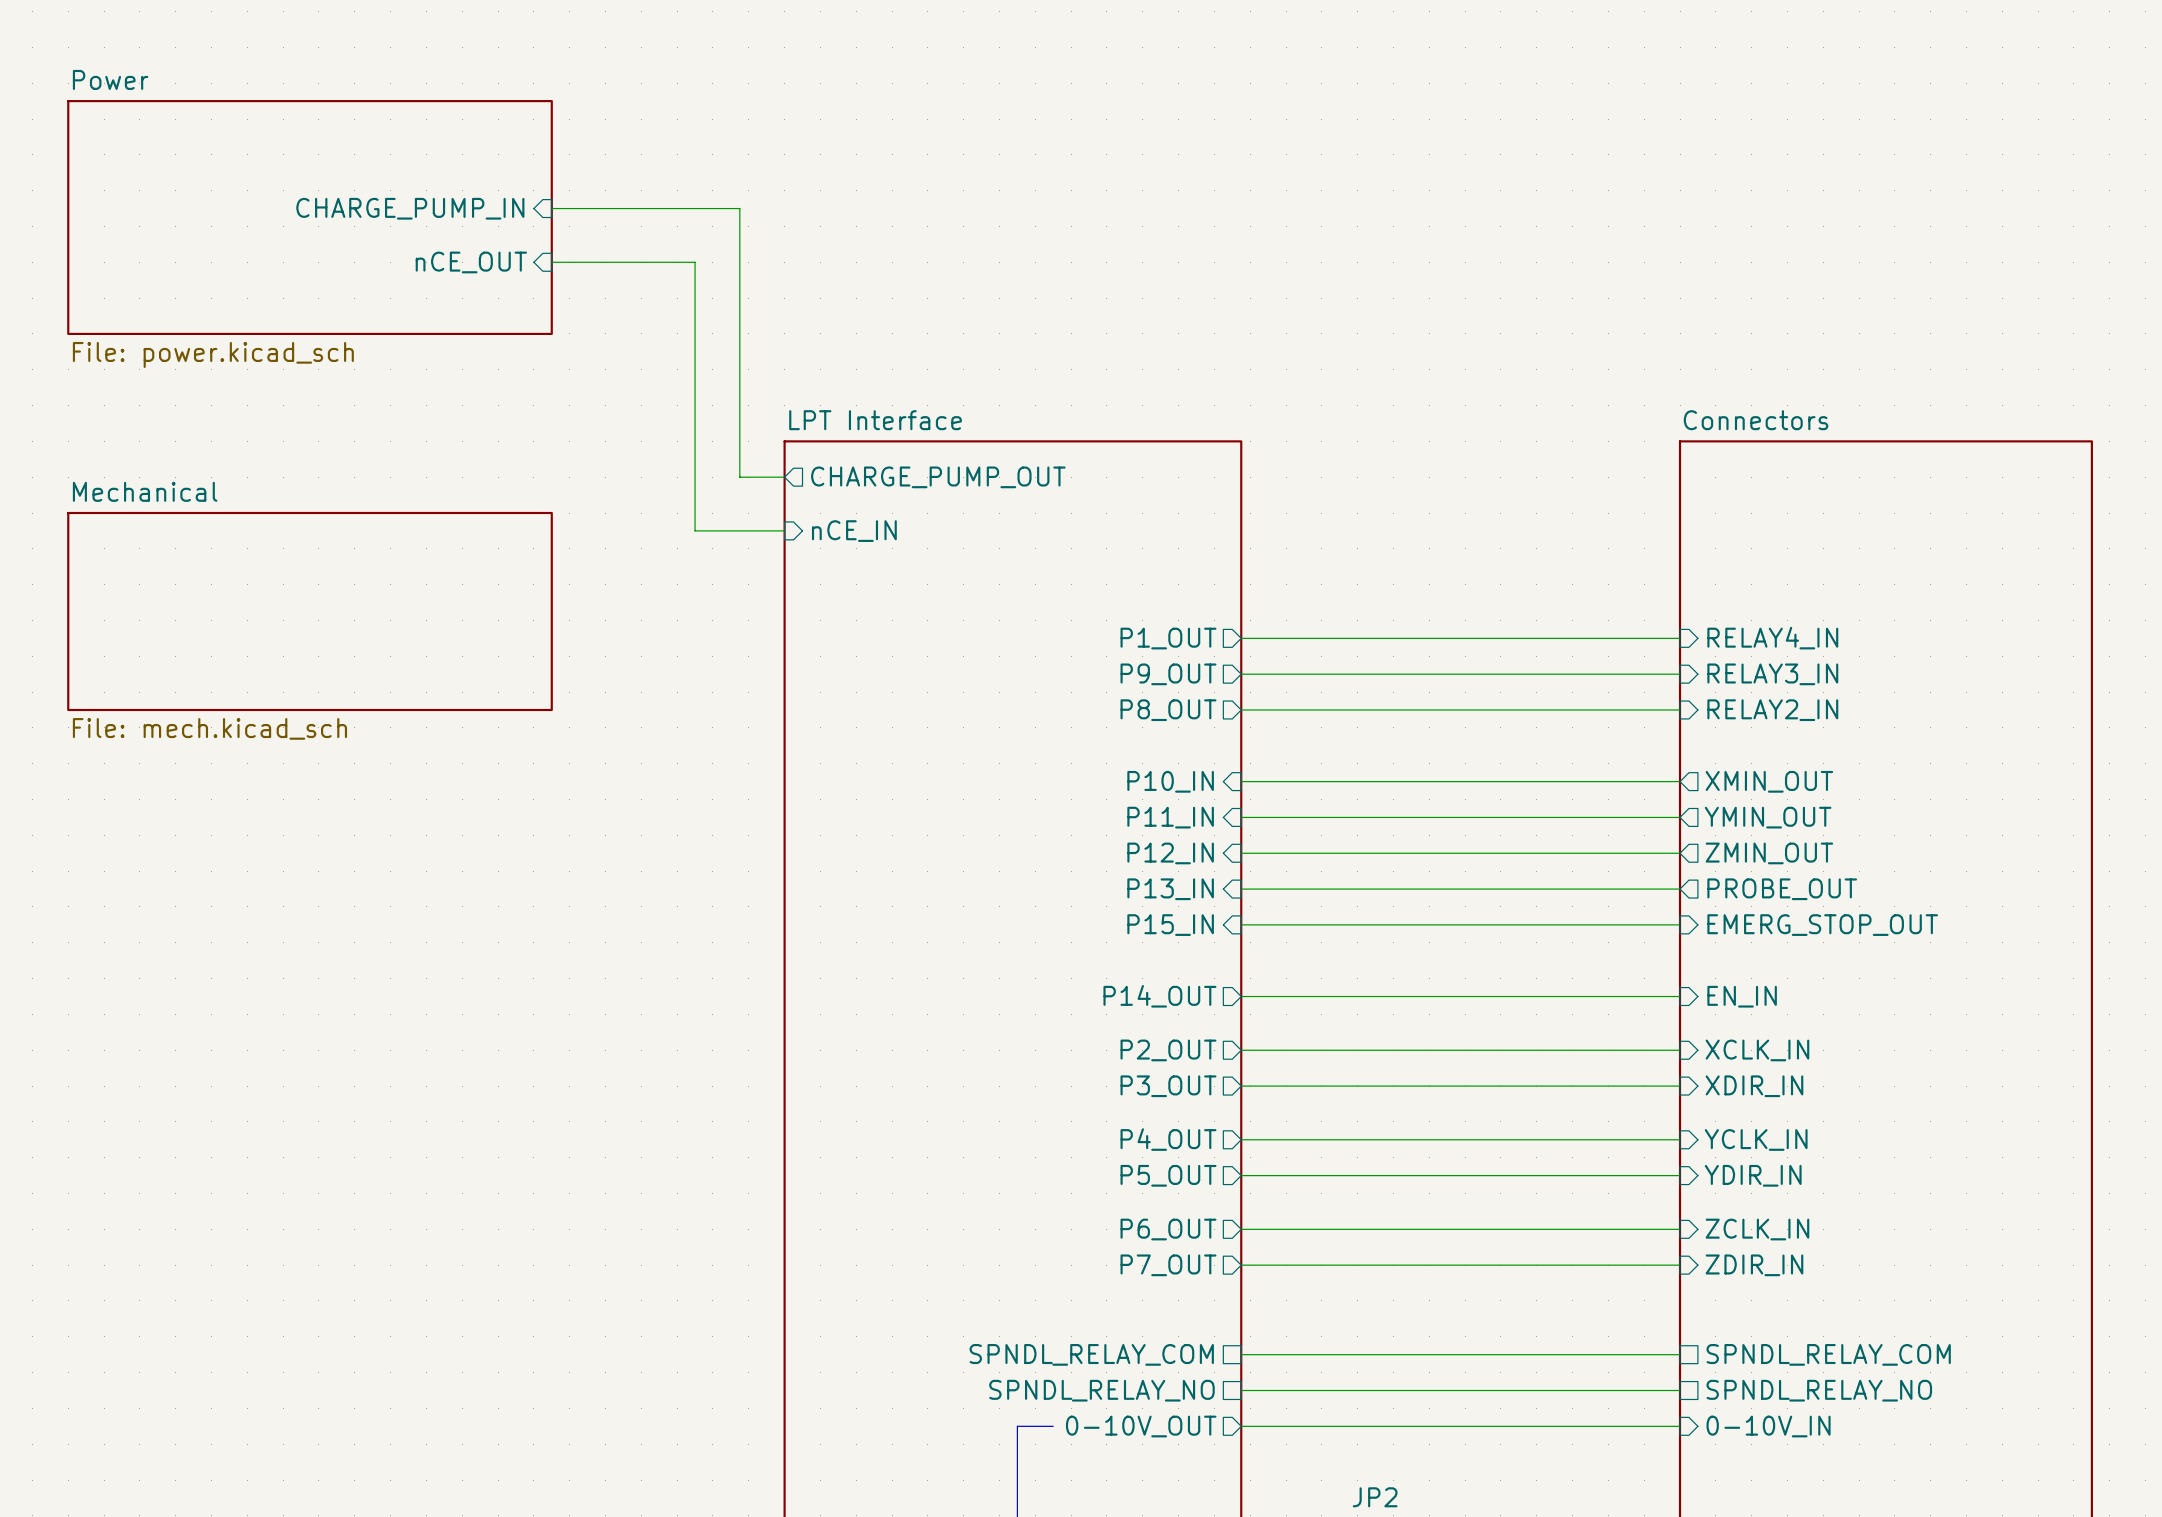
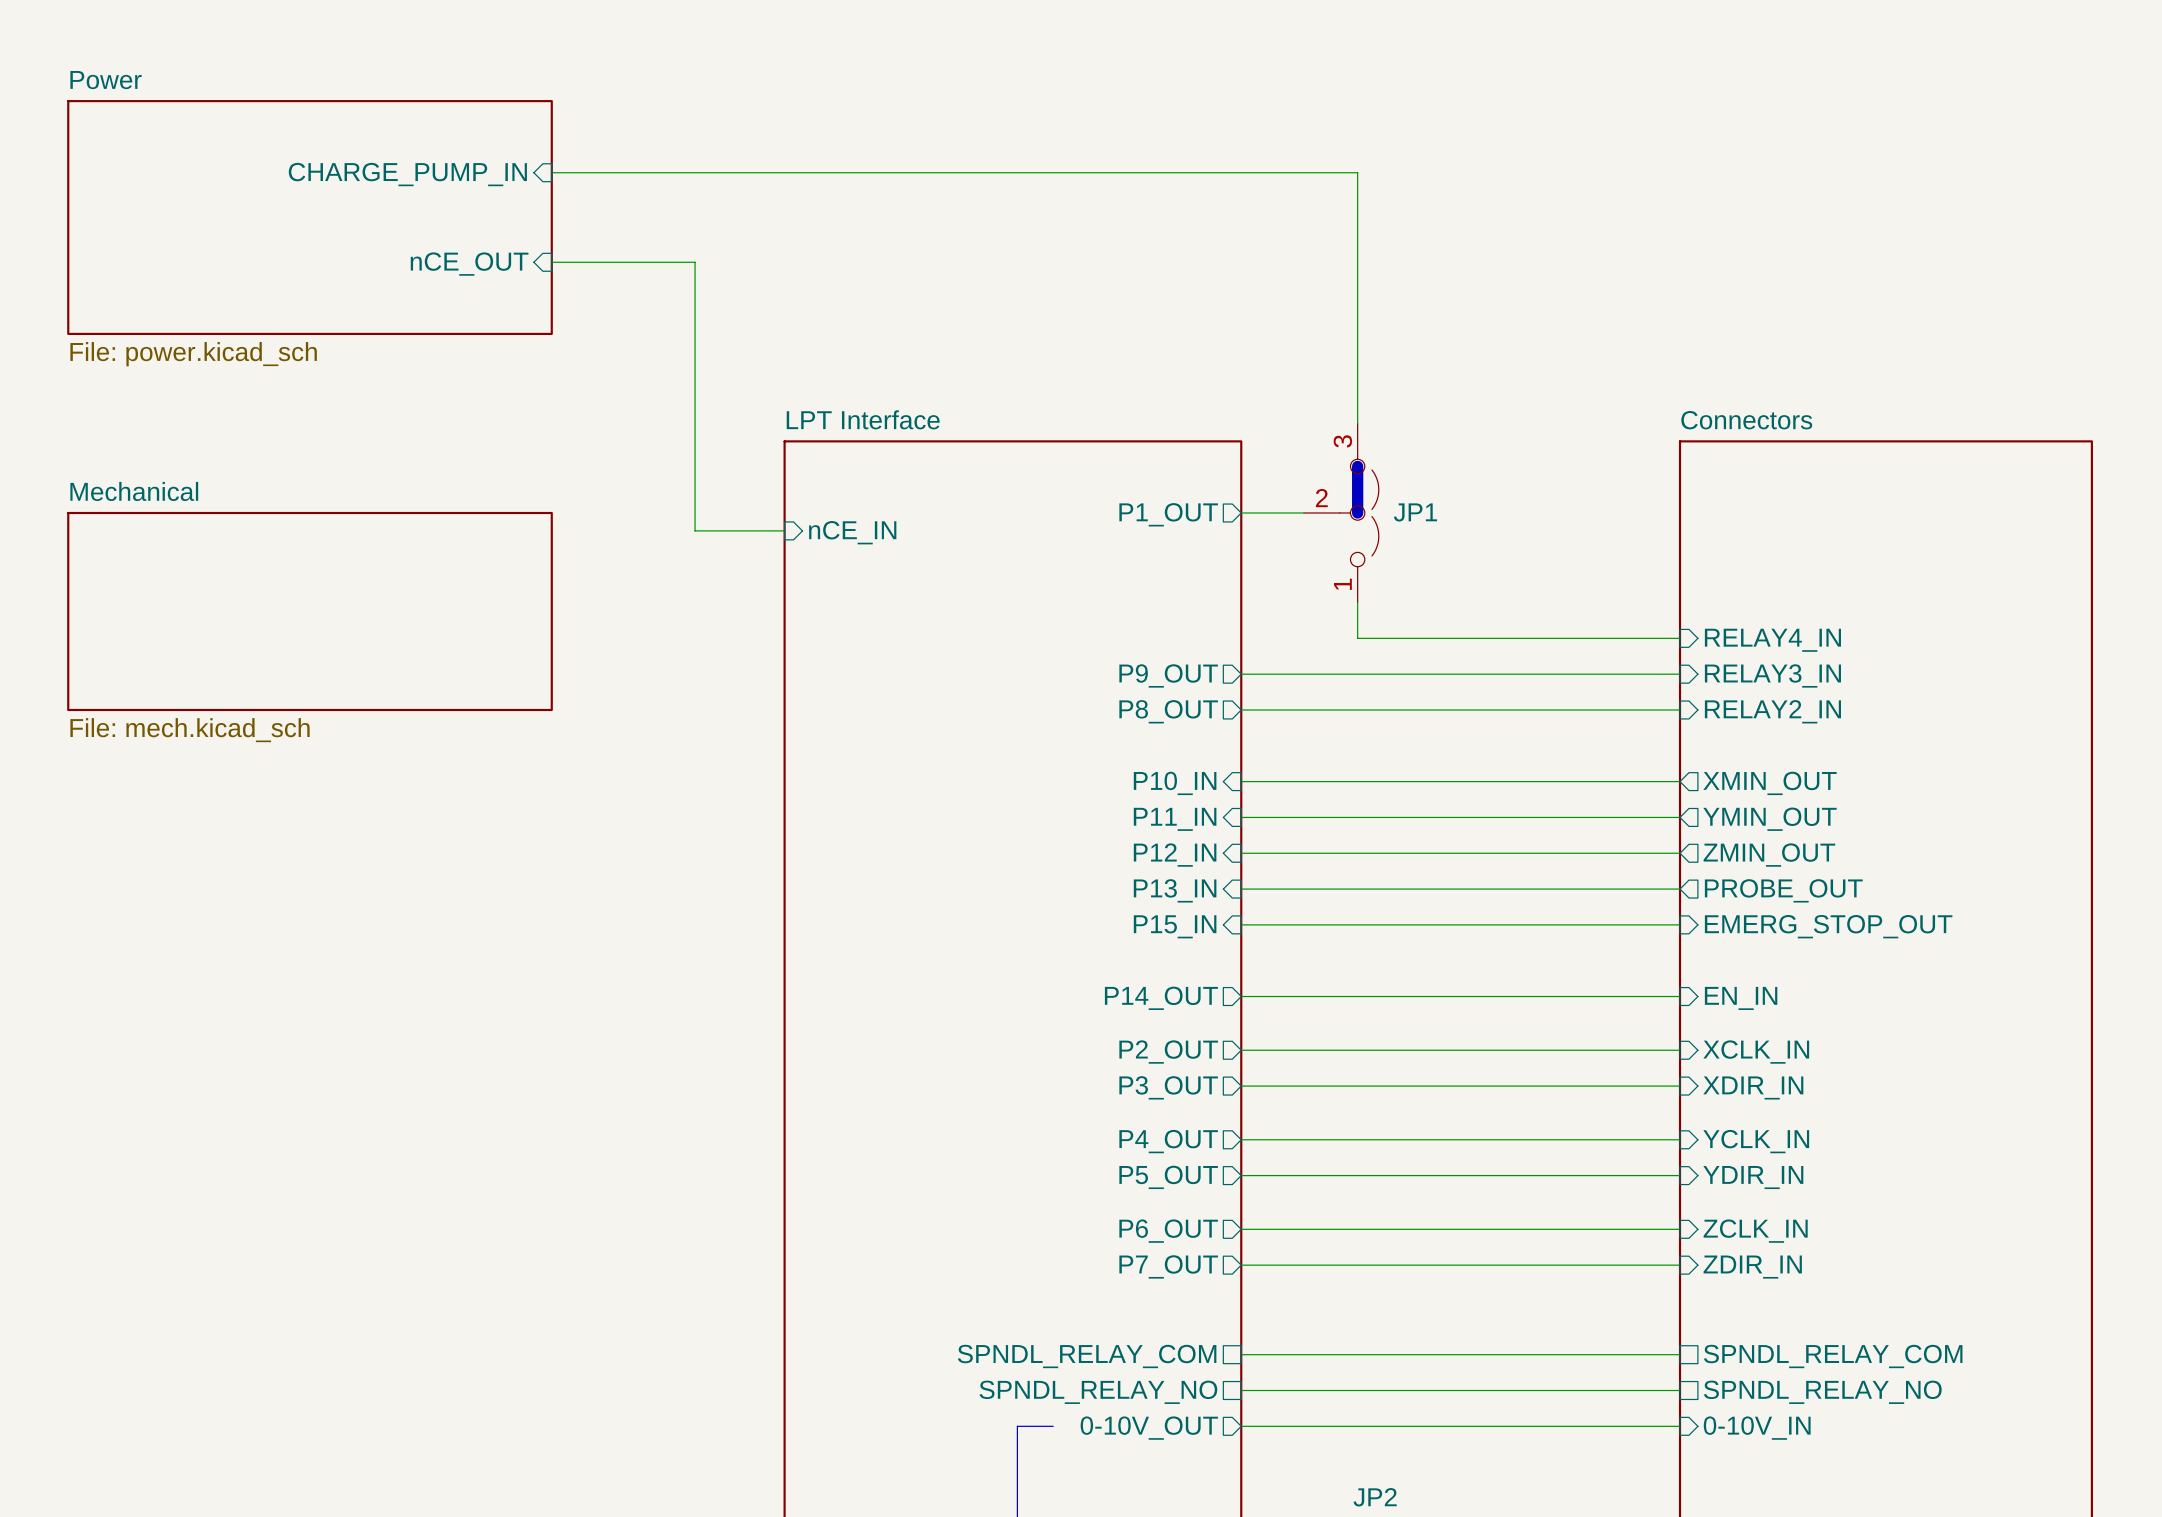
wire: none -> (551, 172) (1357, 172) (1357, 423)
sheet pin position: CHARGE_PUMP_IN (410, 208) -> CHARGE_PUMP_IN (407, 174)
wire: (551, 208) (739, 208) (739, 477) (784, 477) -> none
line: none -> (1357, 466) (1357, 513)
sheet pin: CHARGE_PUMP_OUT (938, 477) -> none
wire: none -> (1241, 513) (1303, 513)
JP1: none -> (1341, 513)
sheet pin position: P1_OUT (1168, 638) -> P1_OUT (1168, 514)
wire: (1241, 638) (1357, 638) -> (1357, 602) (1357, 638)

